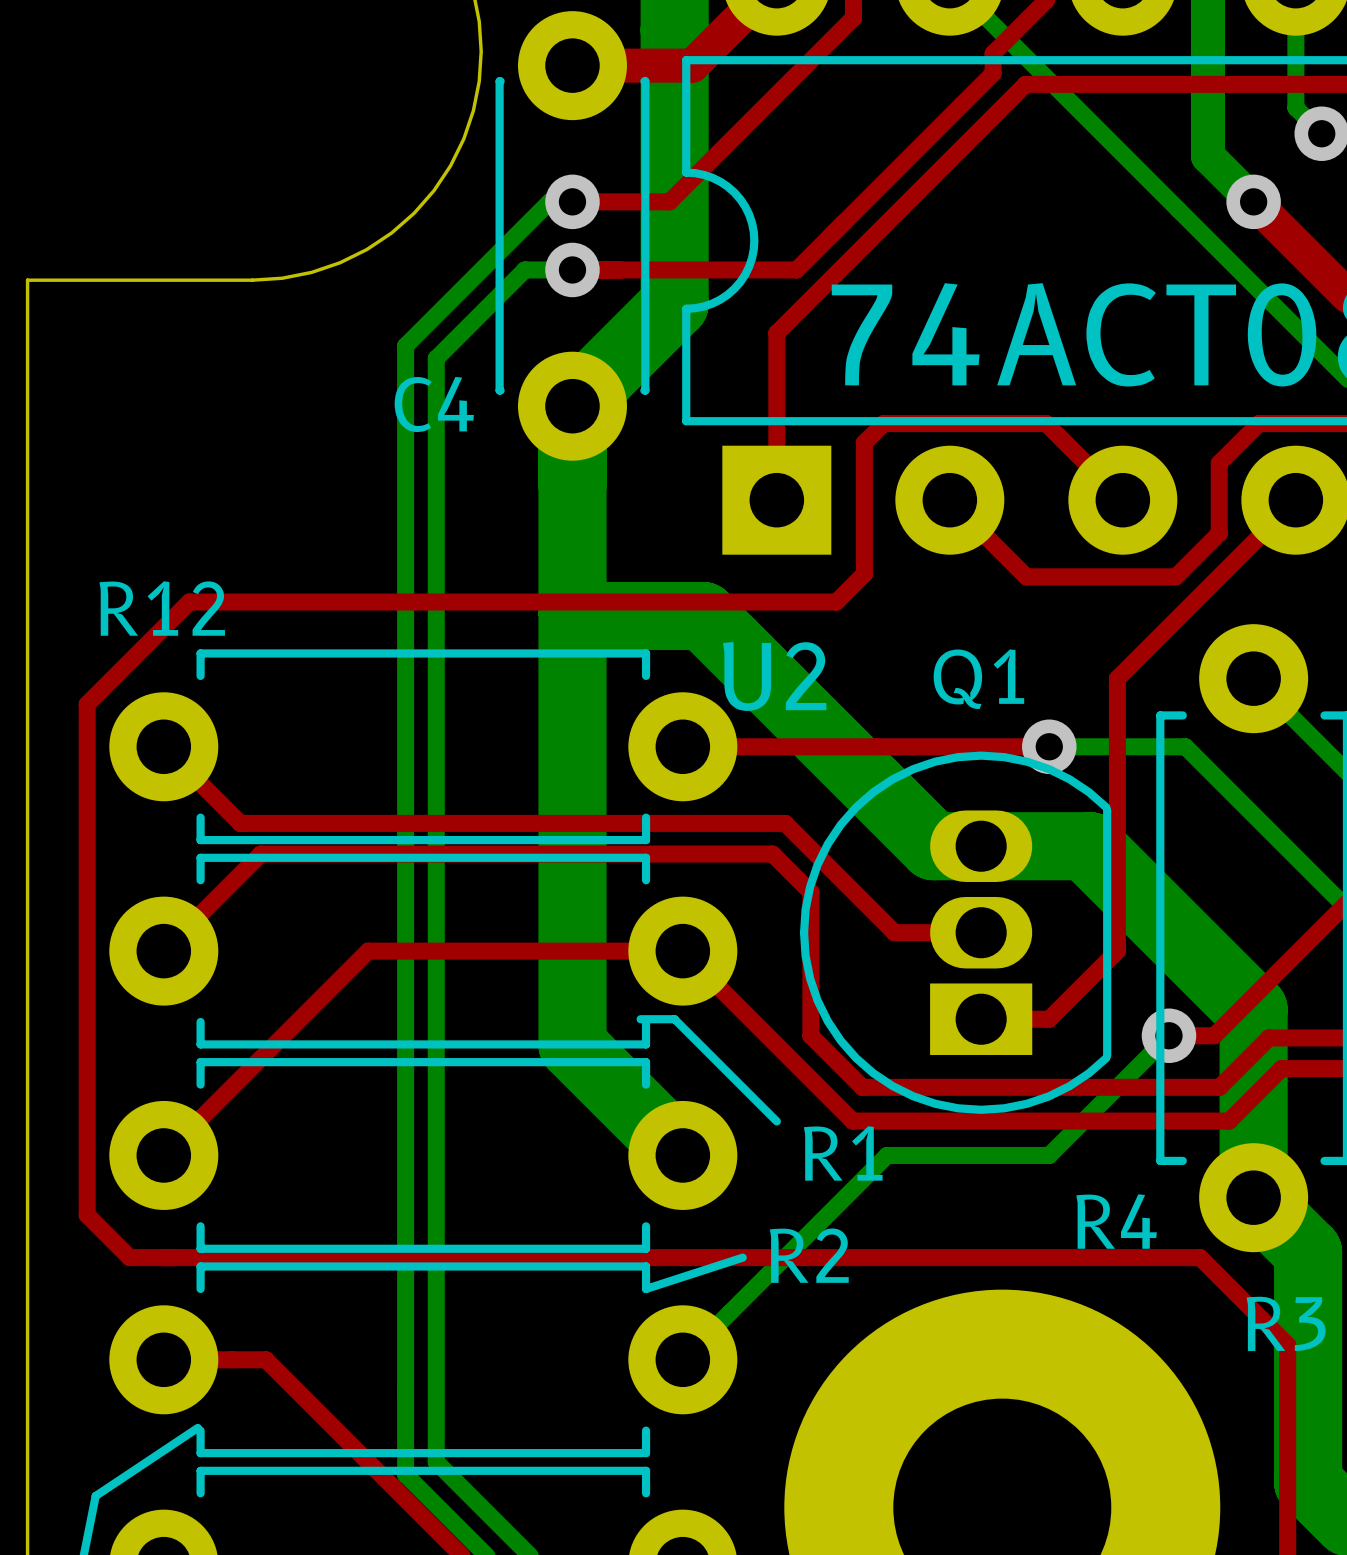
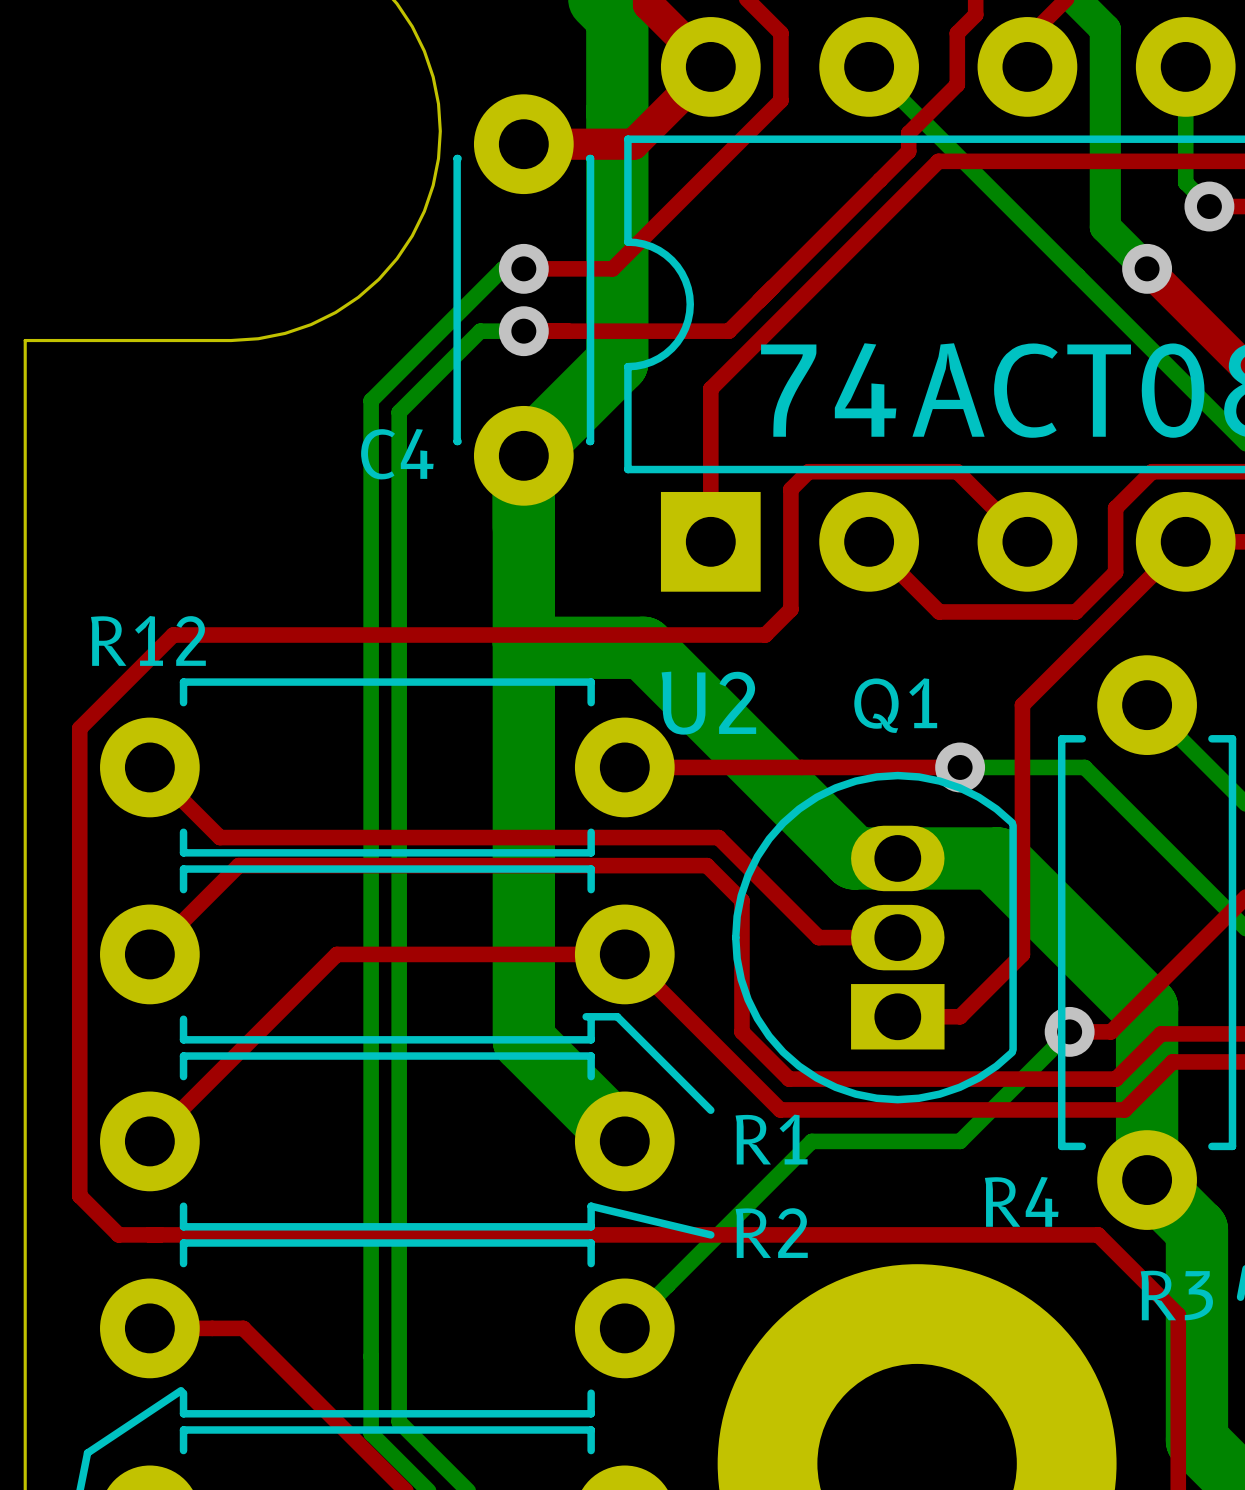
line: none -> (591, 1206) (710, 1234)
R2 name position: R2 (809, 1255) -> R2 (771, 1233)
line: (742, 1257) (646, 1288) -> none

